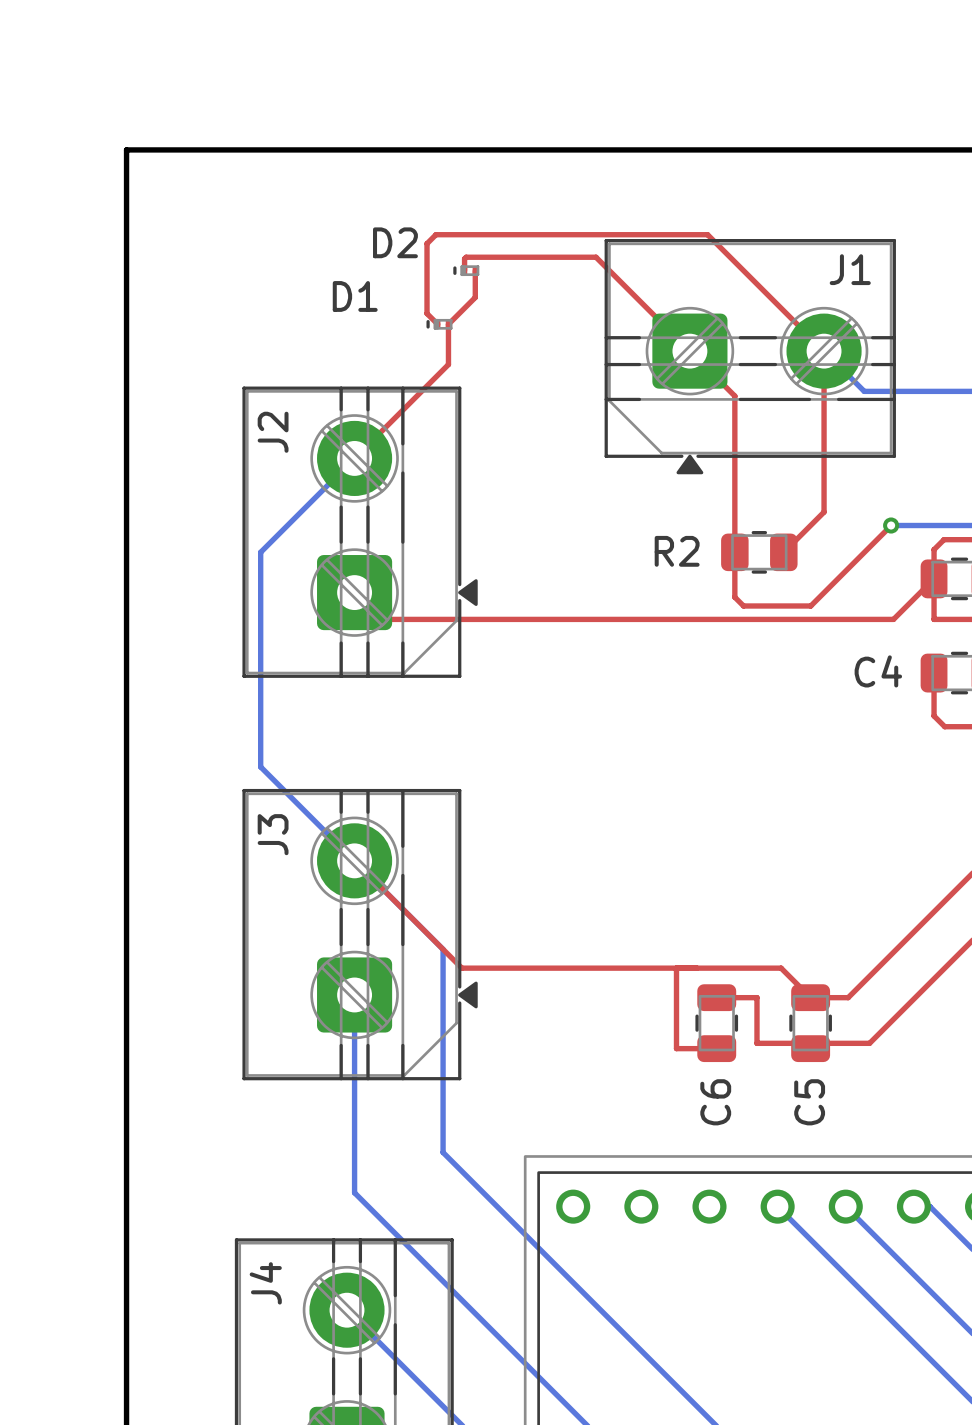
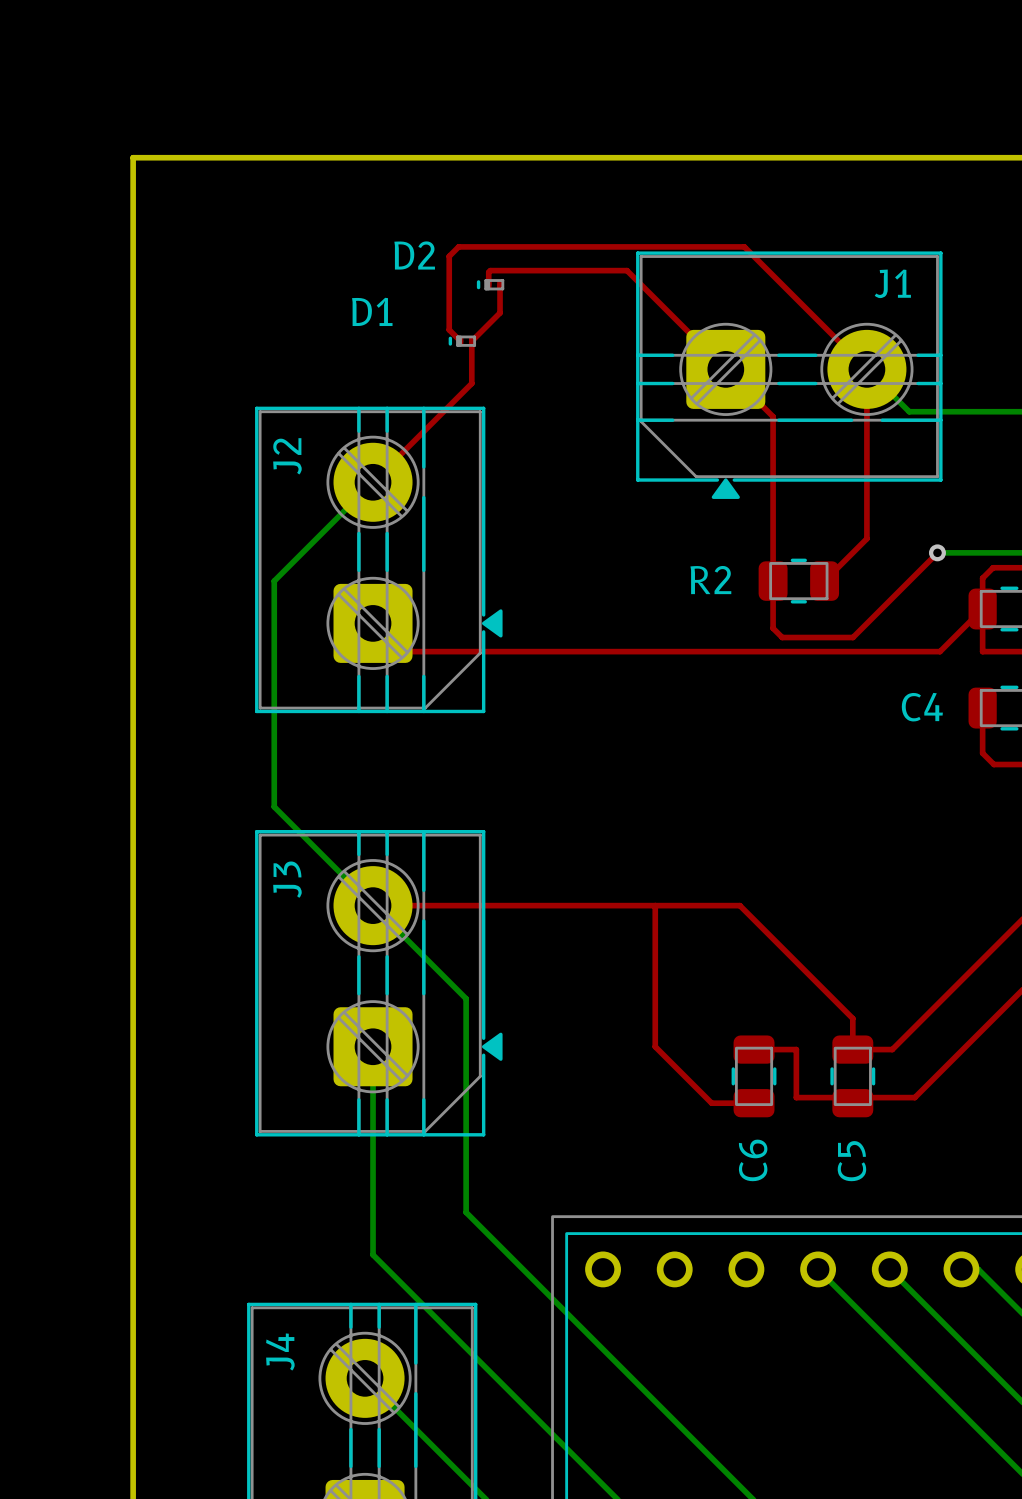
top track: (354, 860) (461, 968) (781, 968) (810, 997) -> (373, 905) (739, 905) (852, 1018) (852, 1049)
top track: (676, 968) (676, 1048) -> (655, 905) (655, 1046) (711, 1103)

